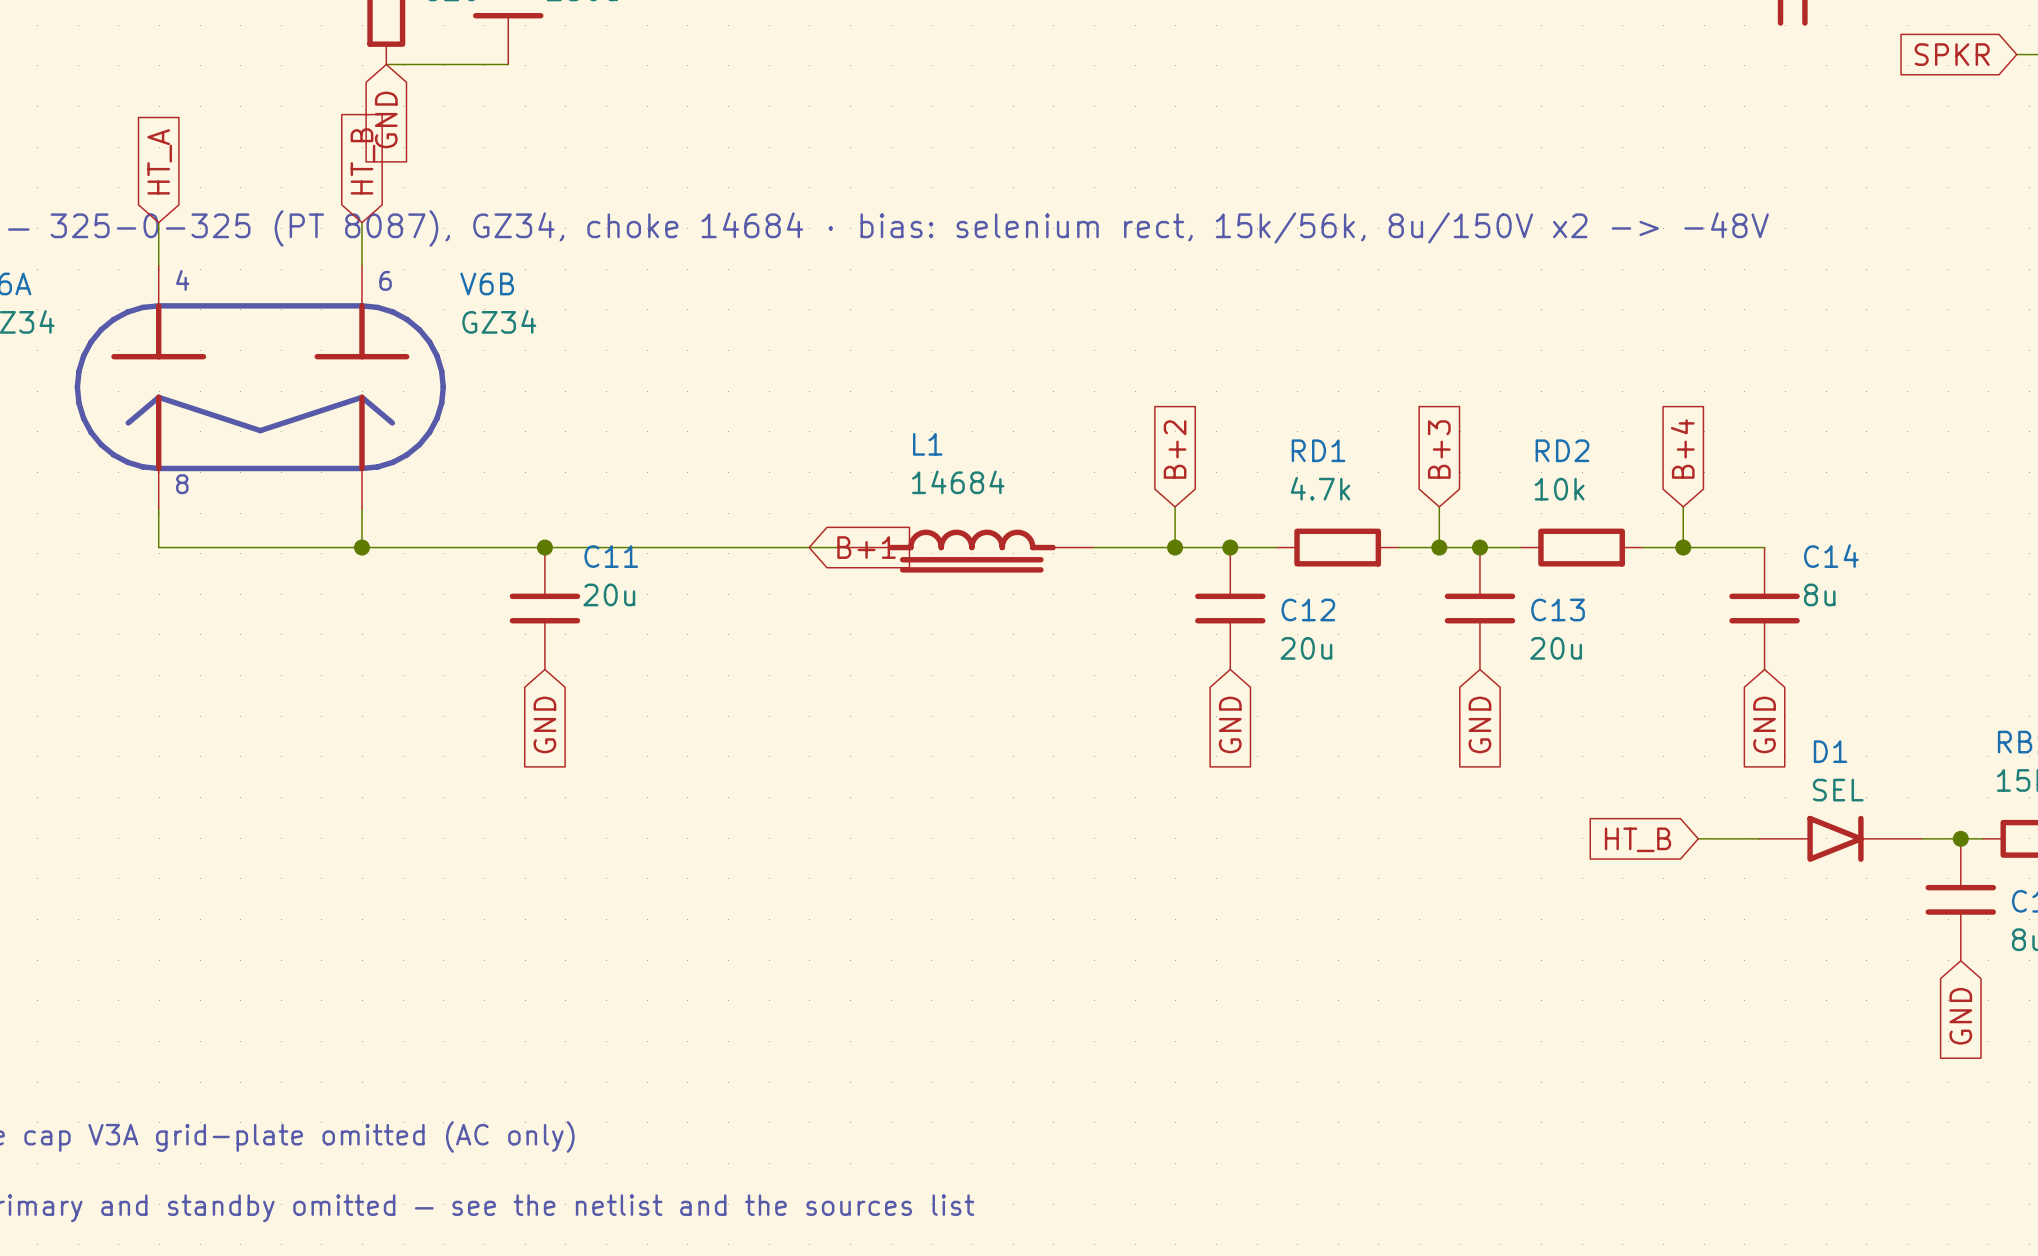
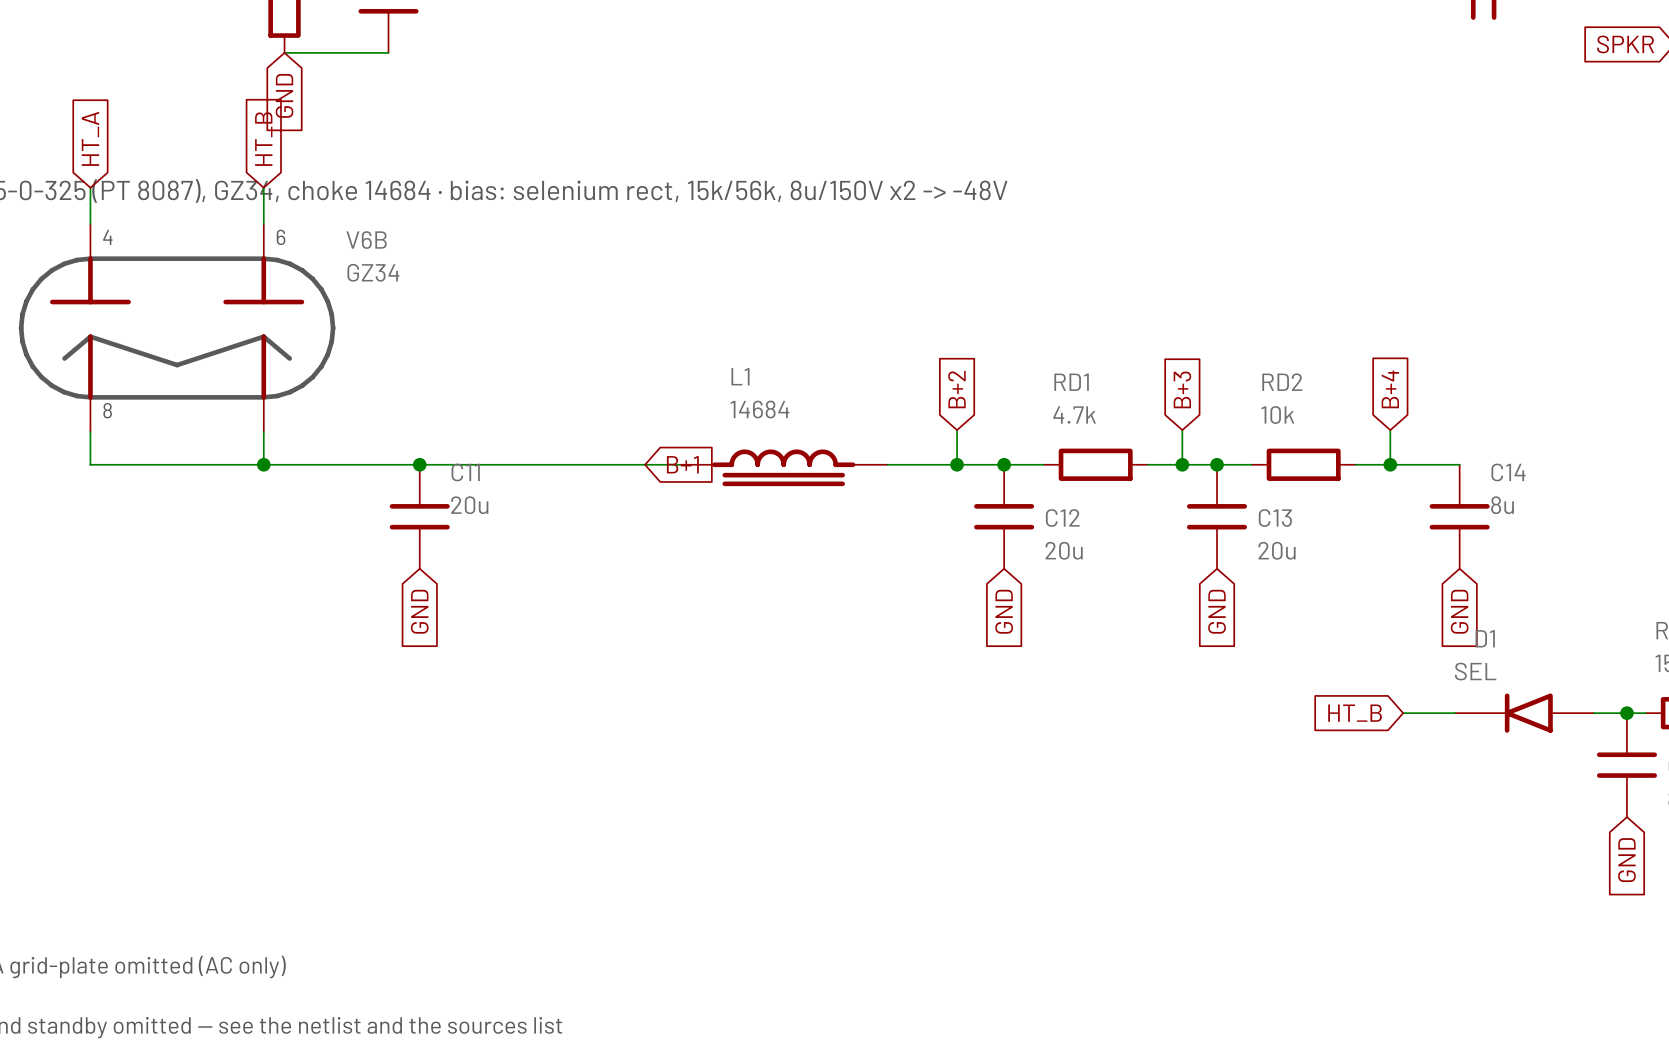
D1 name position: D1 (1830, 751) -> D1 (1485, 638)
D1 value position: SEL (1838, 790) -> SEL (1475, 671)
D1 rotation: 0° (1835, 838) -> 180° (1528, 713)

